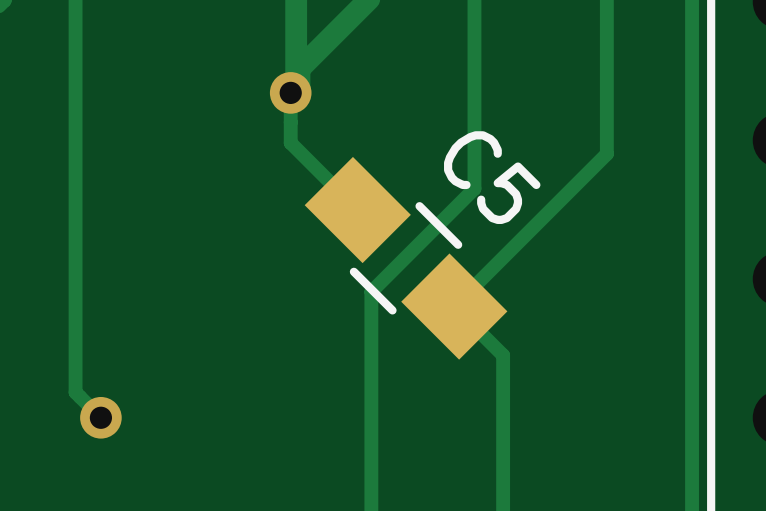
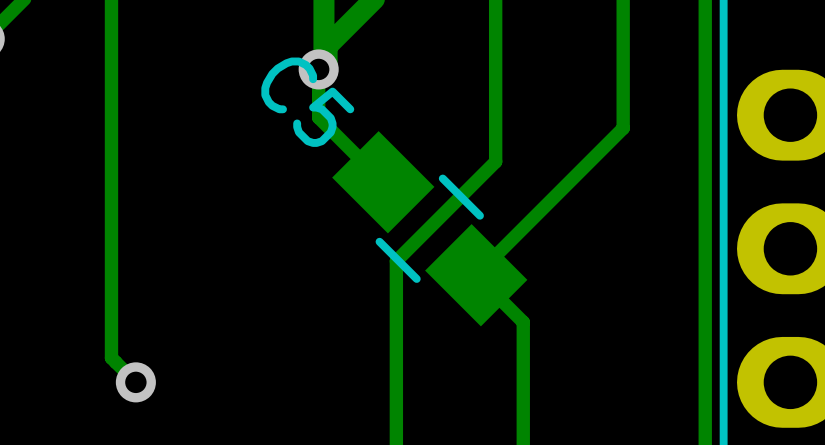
C5 name position: C5 (492, 177) -> C5 (307, 102)

